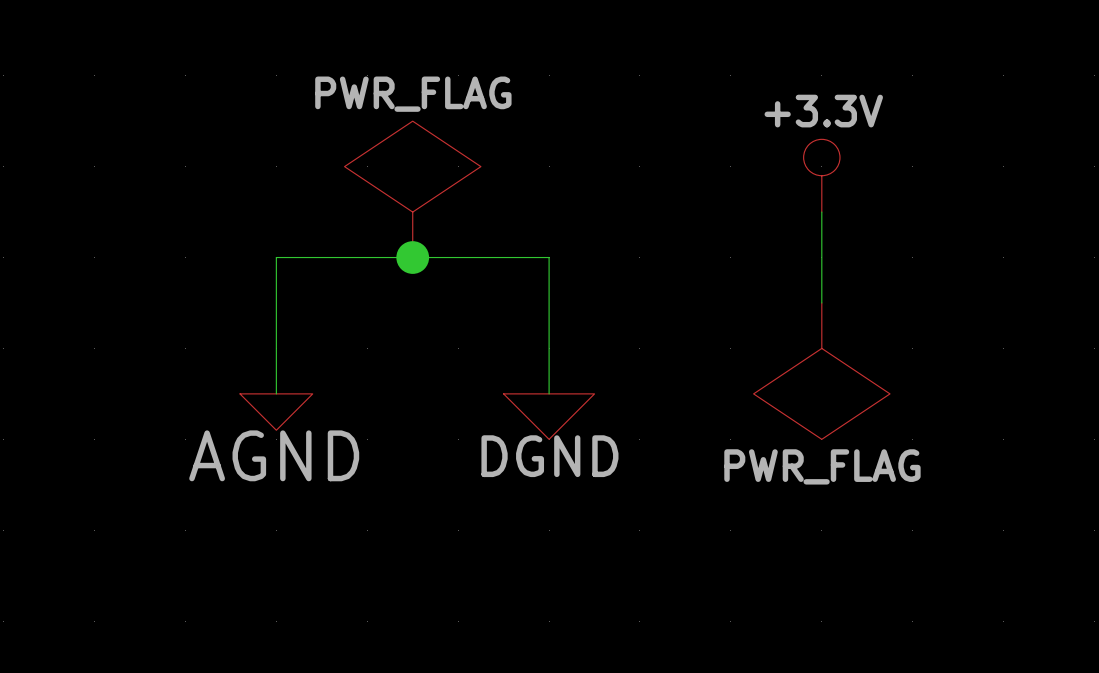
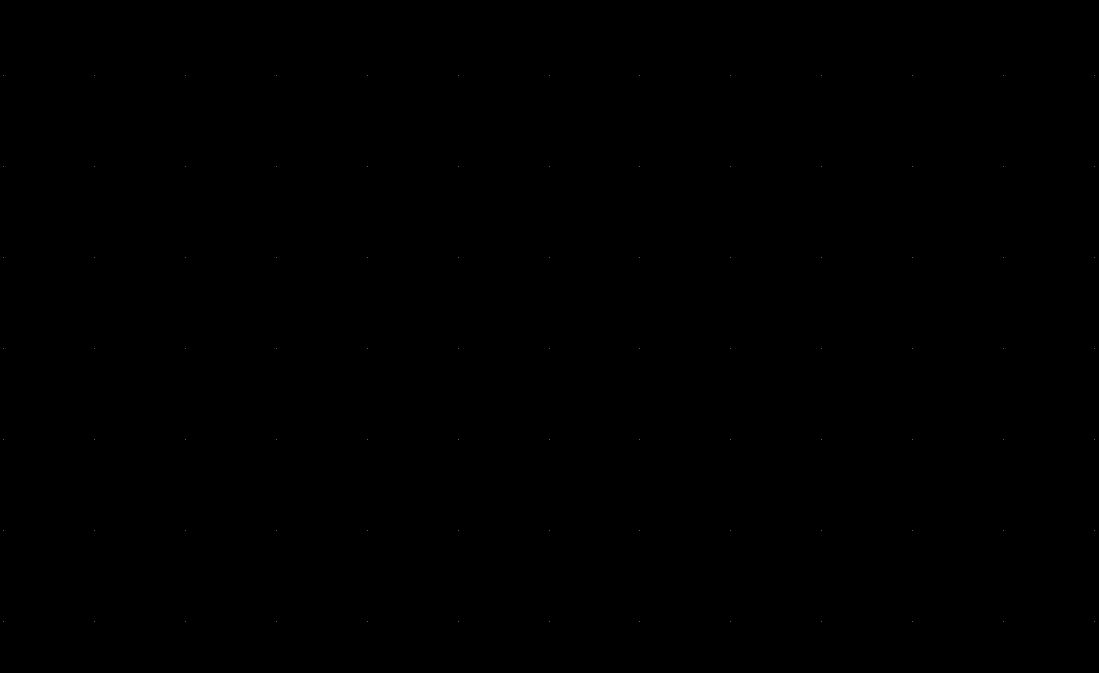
power symbol: +3.3V (821, 175) -> none
power symbol: PWR_FLAG (412, 189) -> none
wire: (821, 212) (821, 302) -> none
junction: (412, 257) -> none
power symbol: PWR_FLAG (821, 371) -> none
wire: (276, 393) (276, 257) (549, 257) (549, 393) -> none
power symbol: AGND (276, 412) -> none
power symbol: DGND (549, 416) -> none

